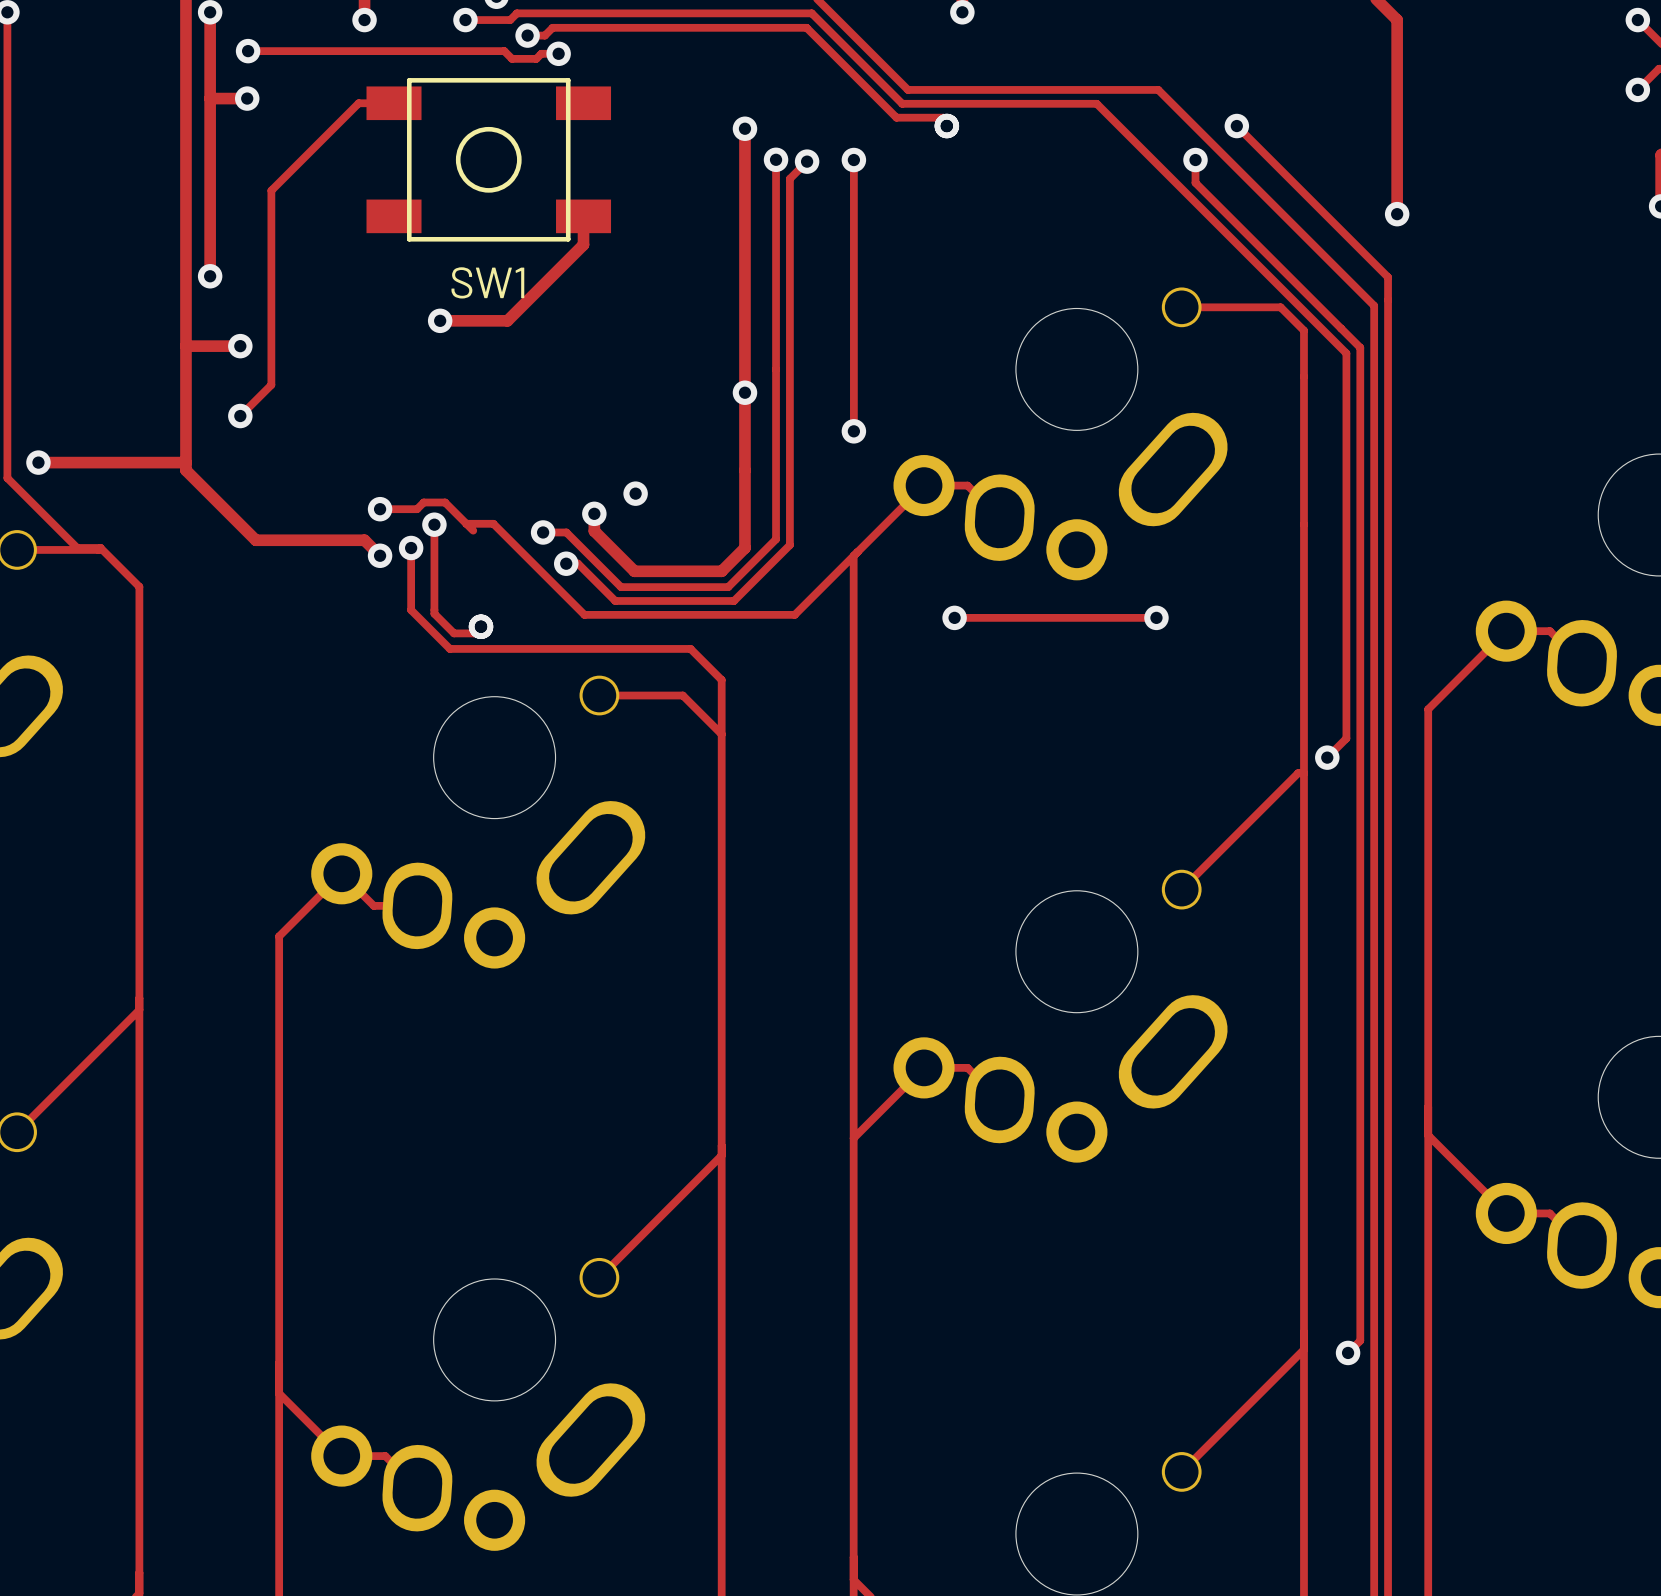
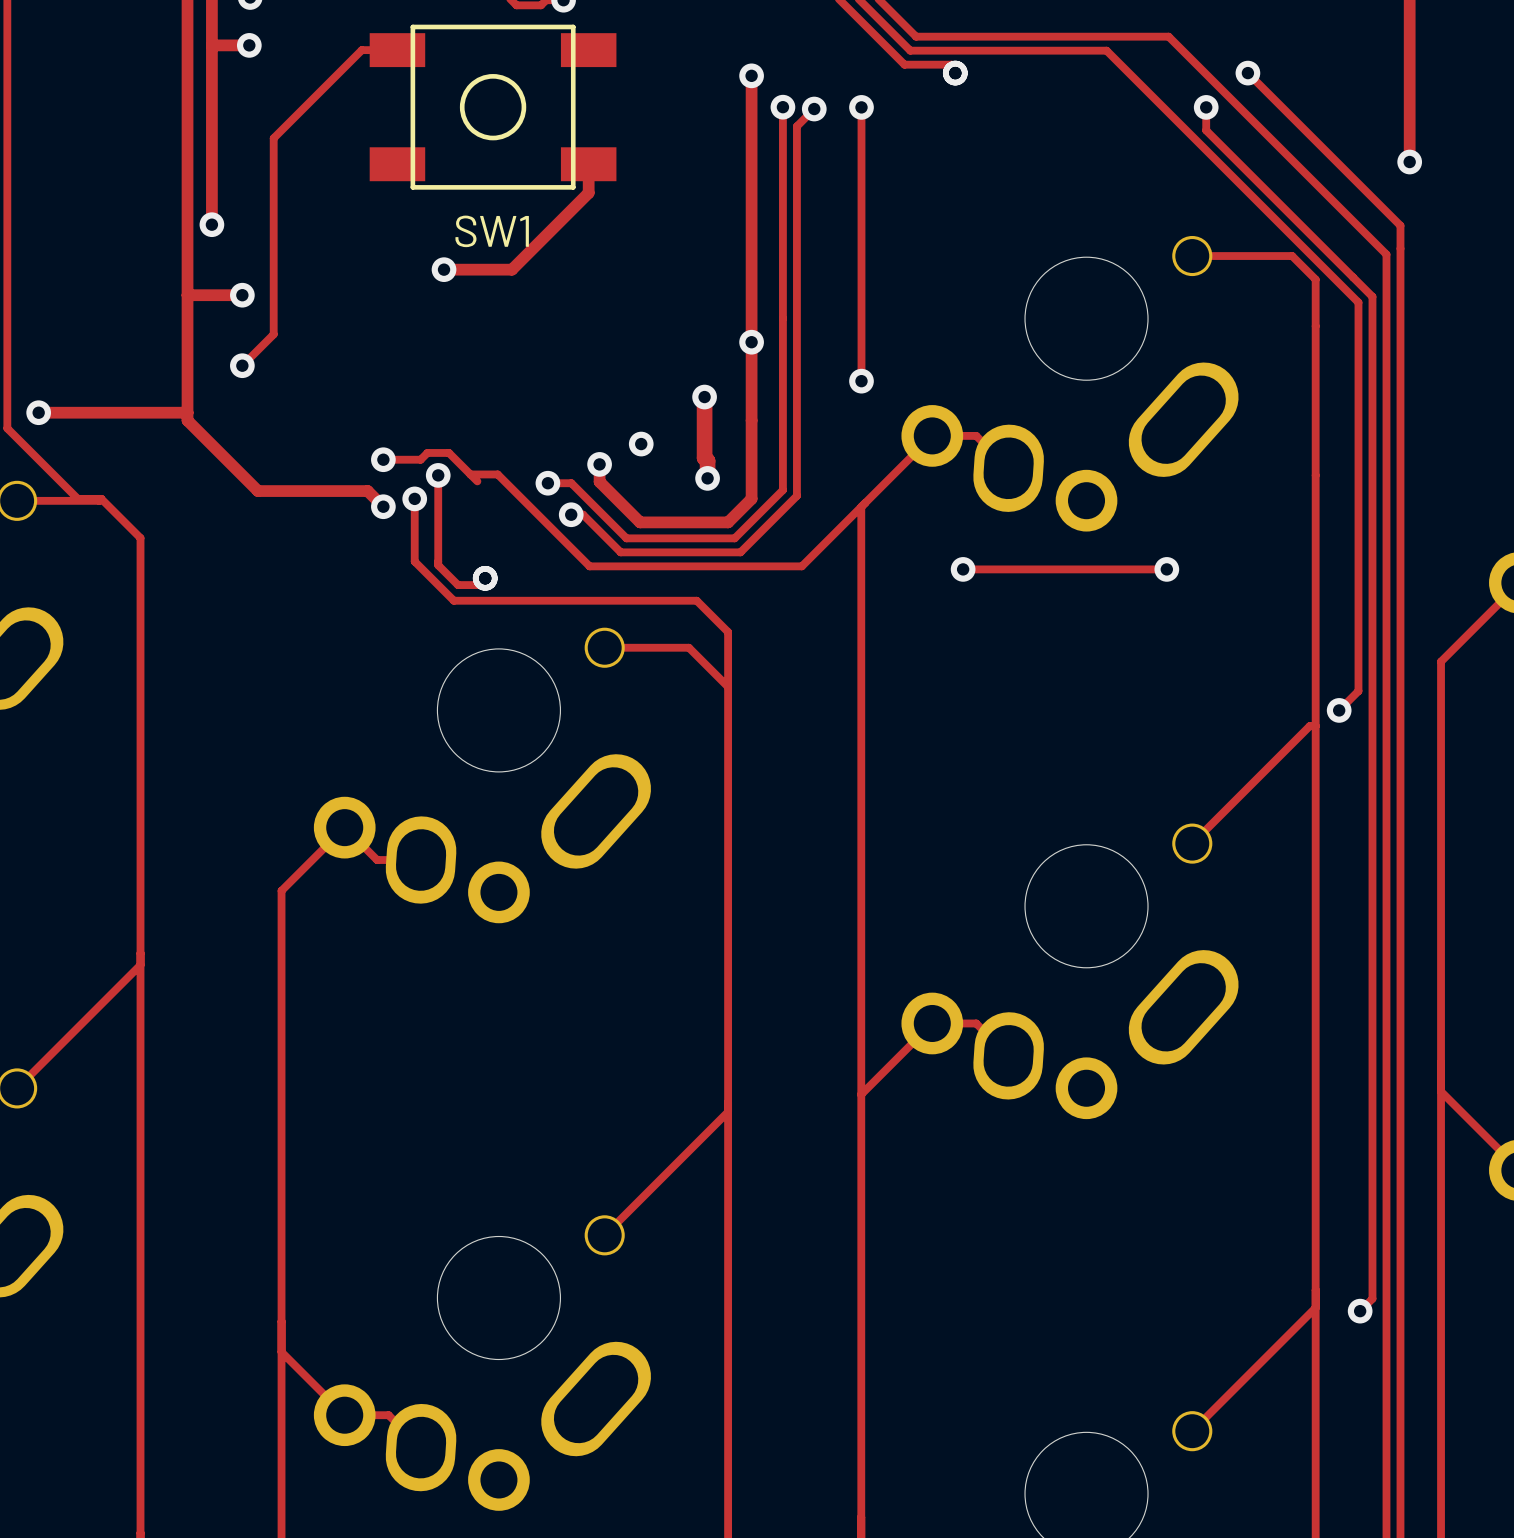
track: none -> (704, 397) (704, 457) (707, 460) (707, 478)
via: none -> (704, 397)
via: none -> (707, 478)

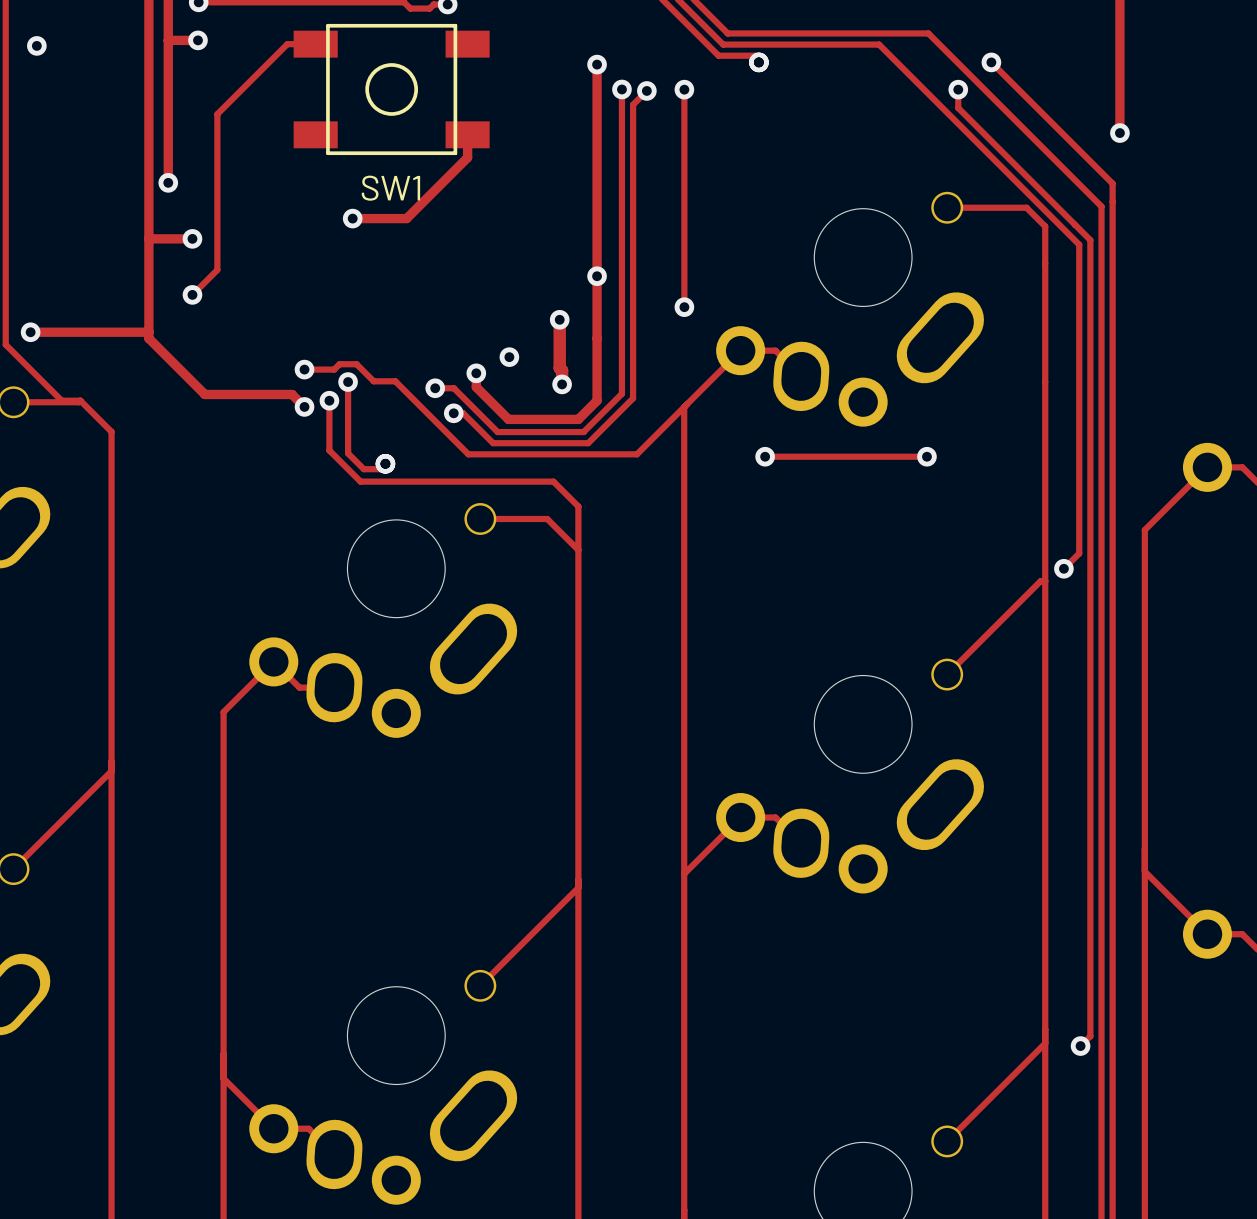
via: none -> (36, 45)
track: (470, 474) (477, 481) -> none

